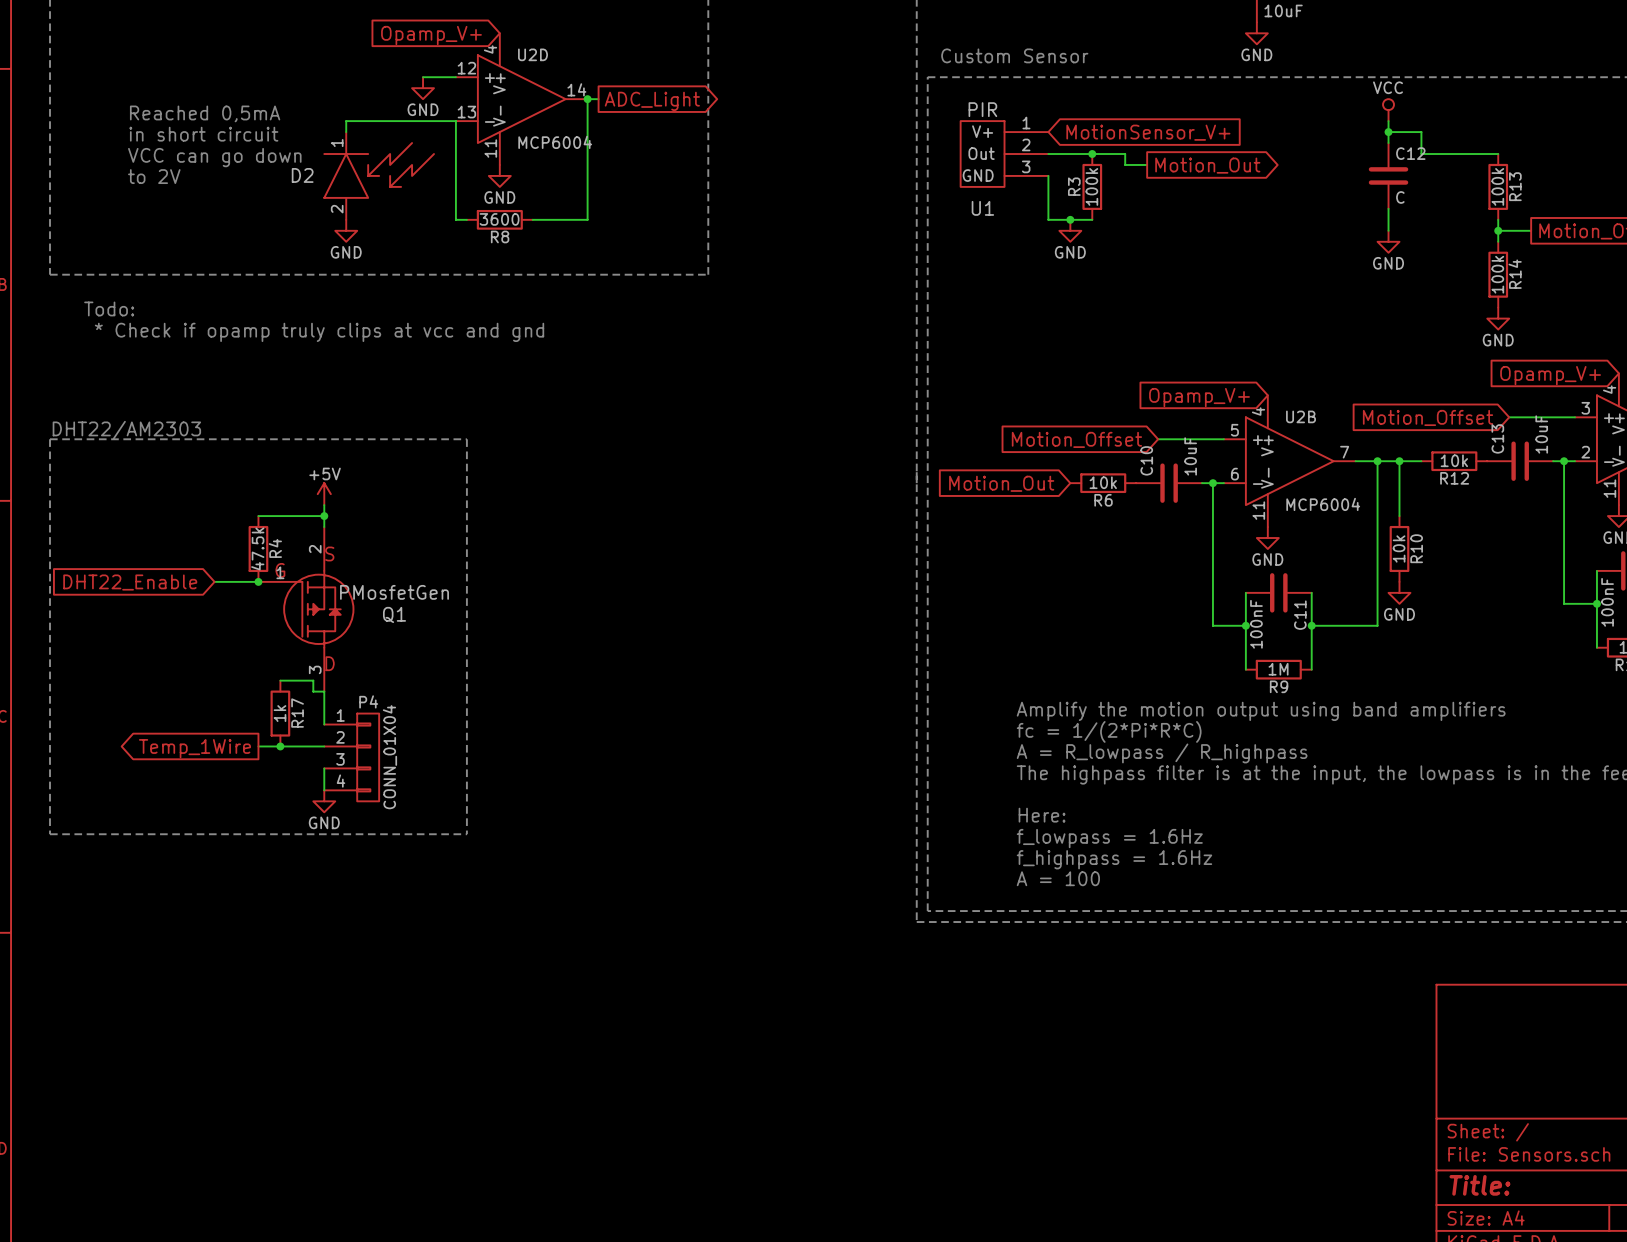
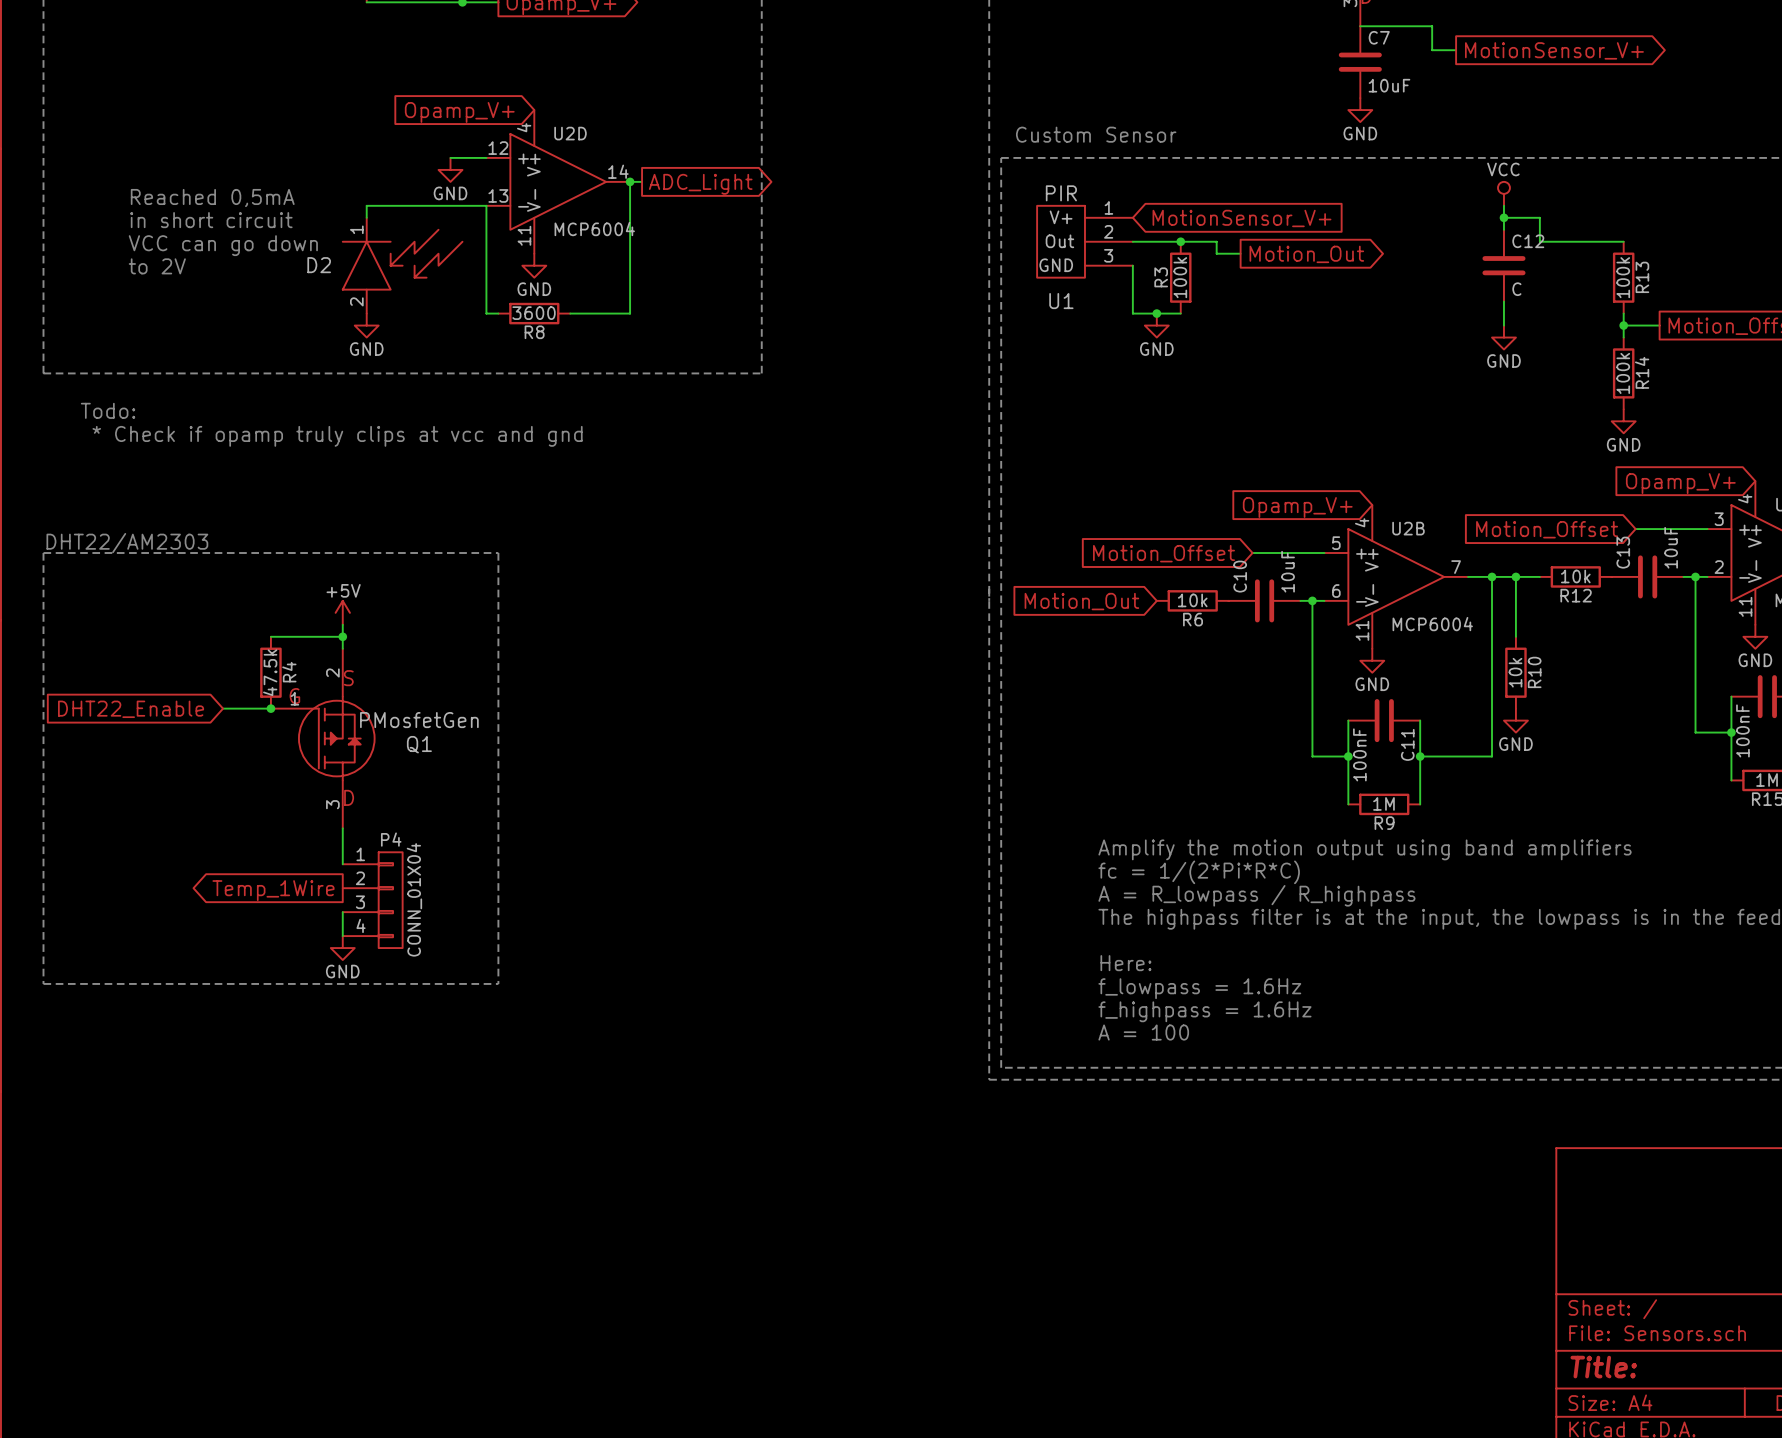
wire: (280, 680) (313, 680) (313, 691) (324, 691) -> none
R17: 1k (280, 713) -> none
wire: (258, 746) (324, 746) -> none
junction: (280, 746) -> none
global label position: Temp_1Wire (194, 748) -> Temp_1Wire (273, 890)

